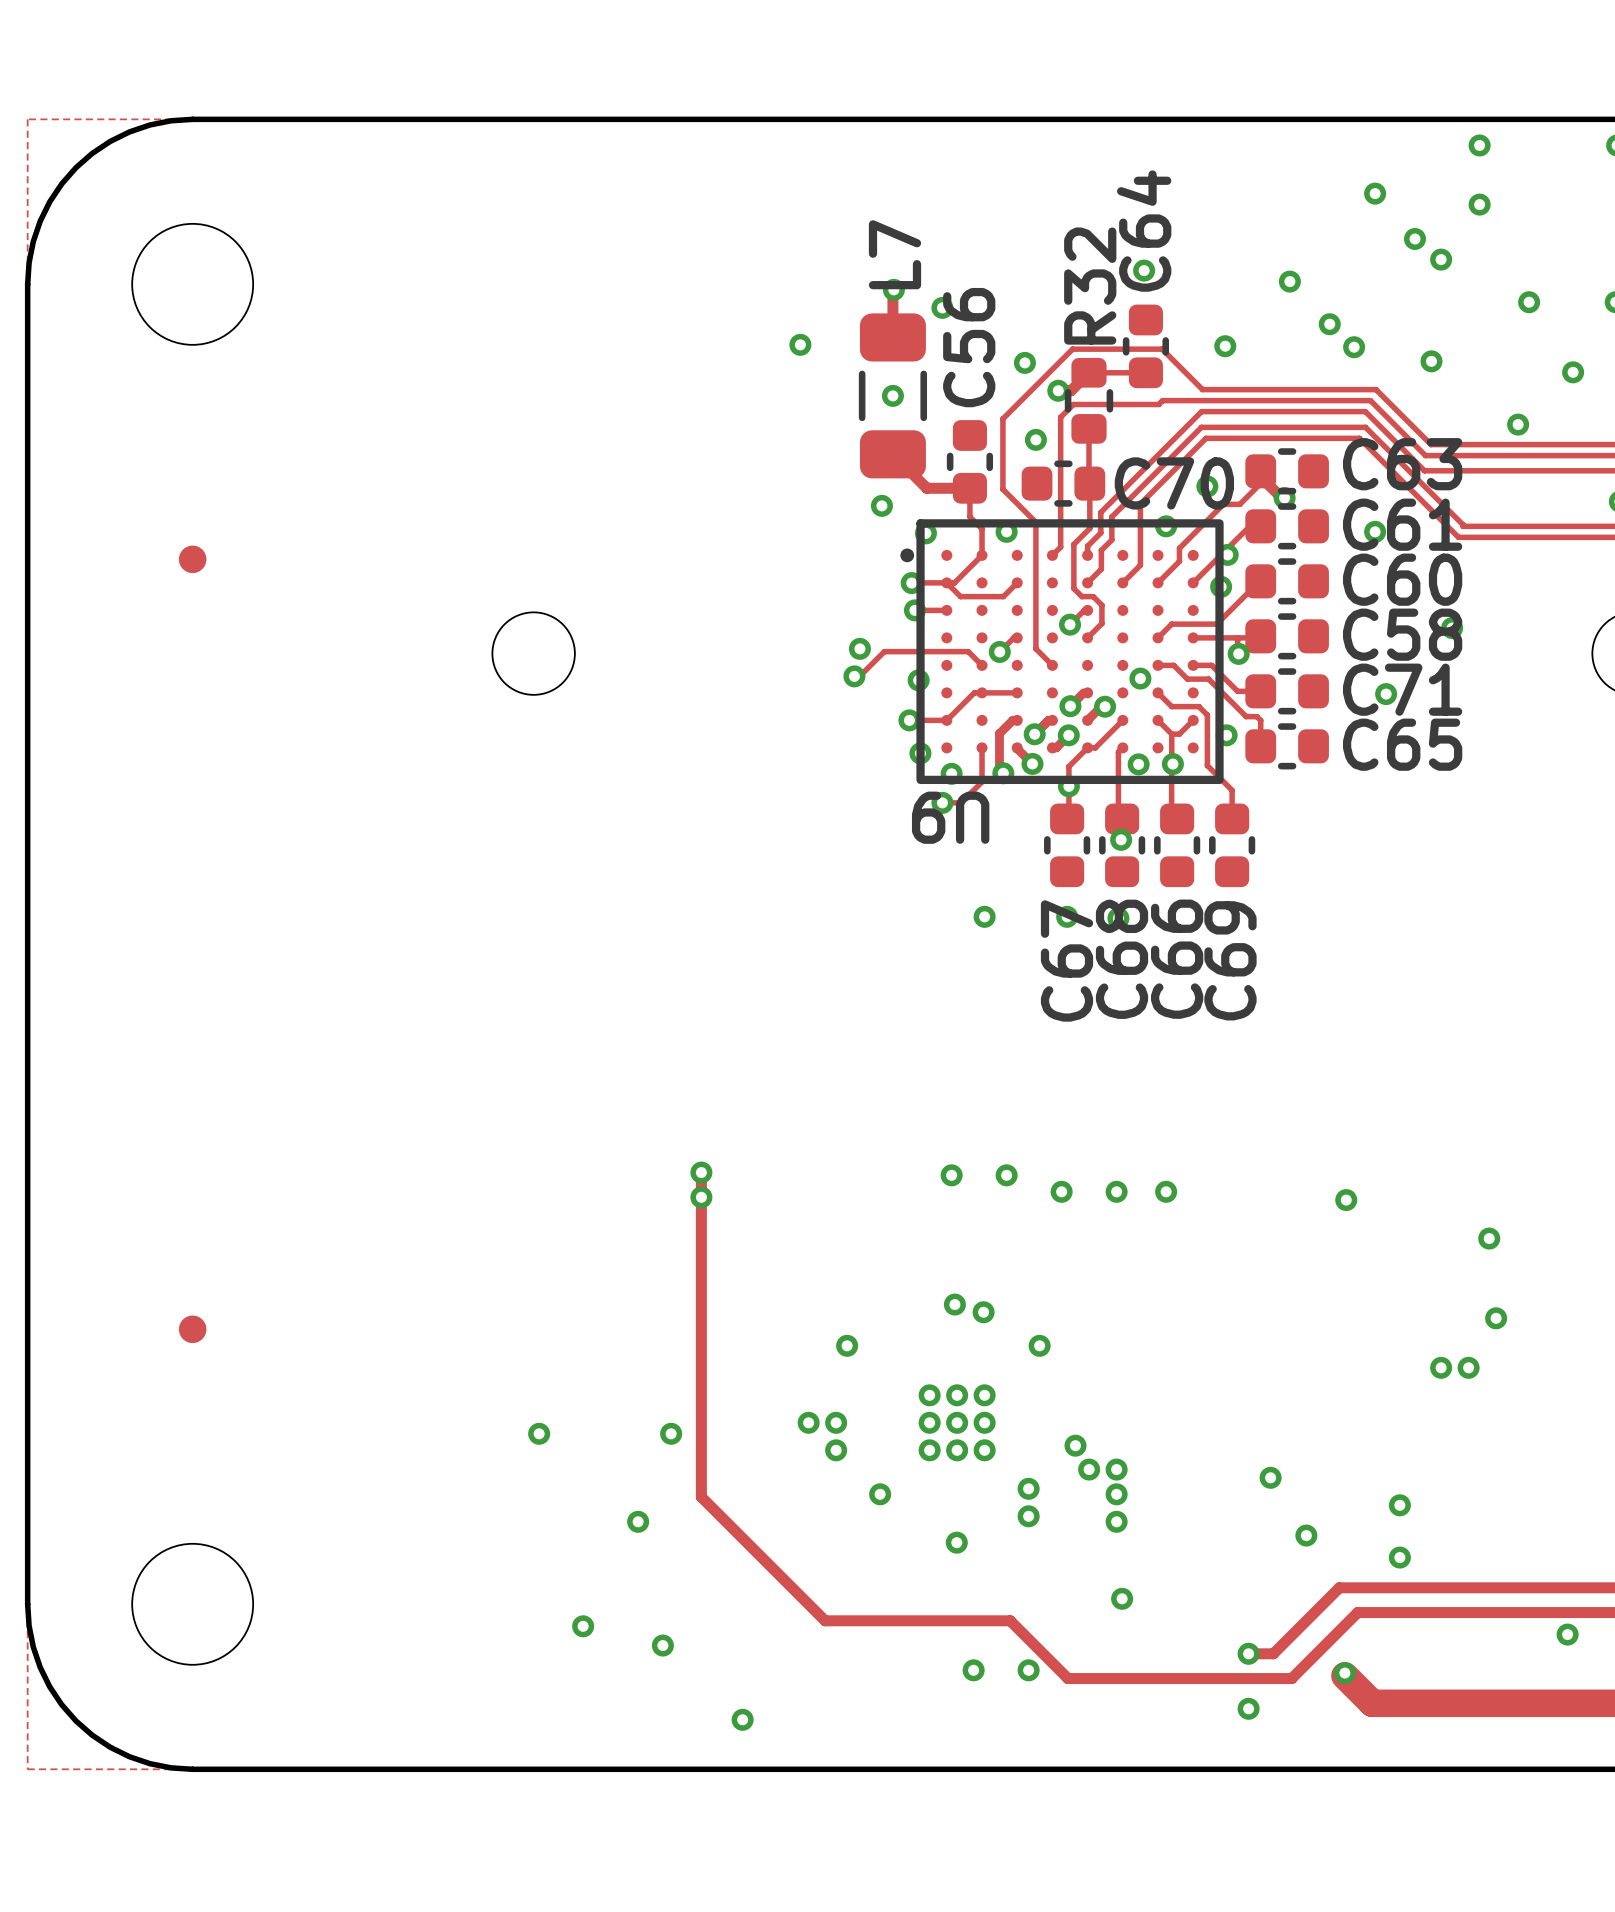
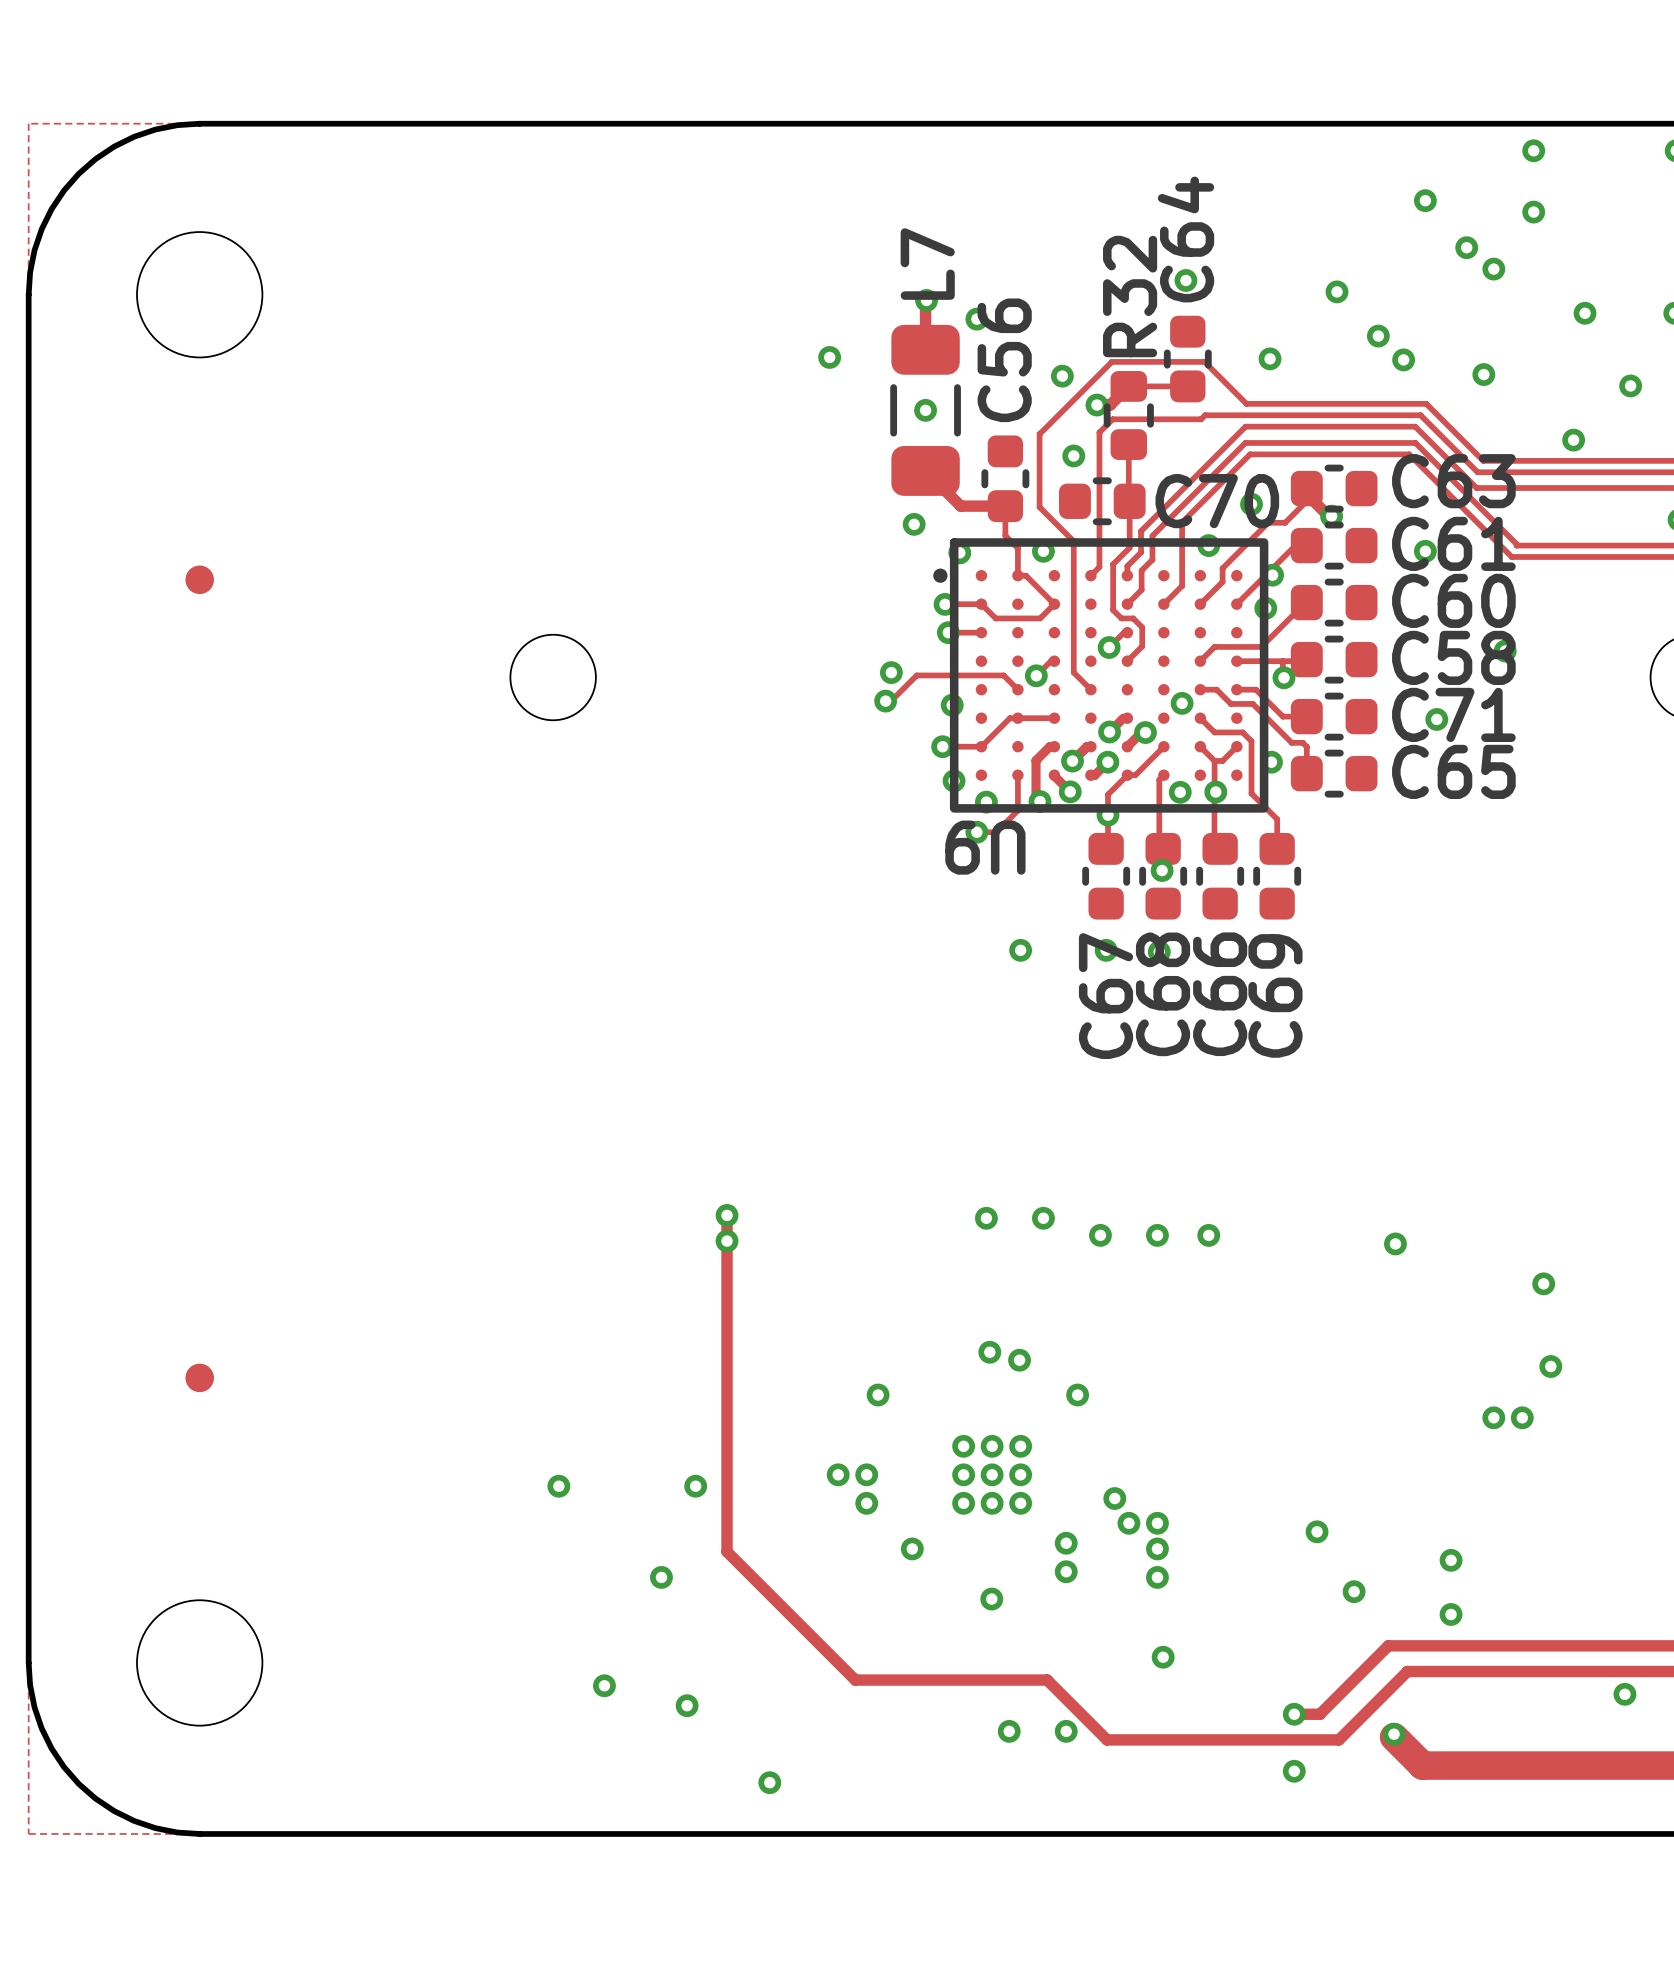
track: (982, 555) (954, 582) (946, 582) -> (1017, 575) (1025, 575) (1054, 604)

